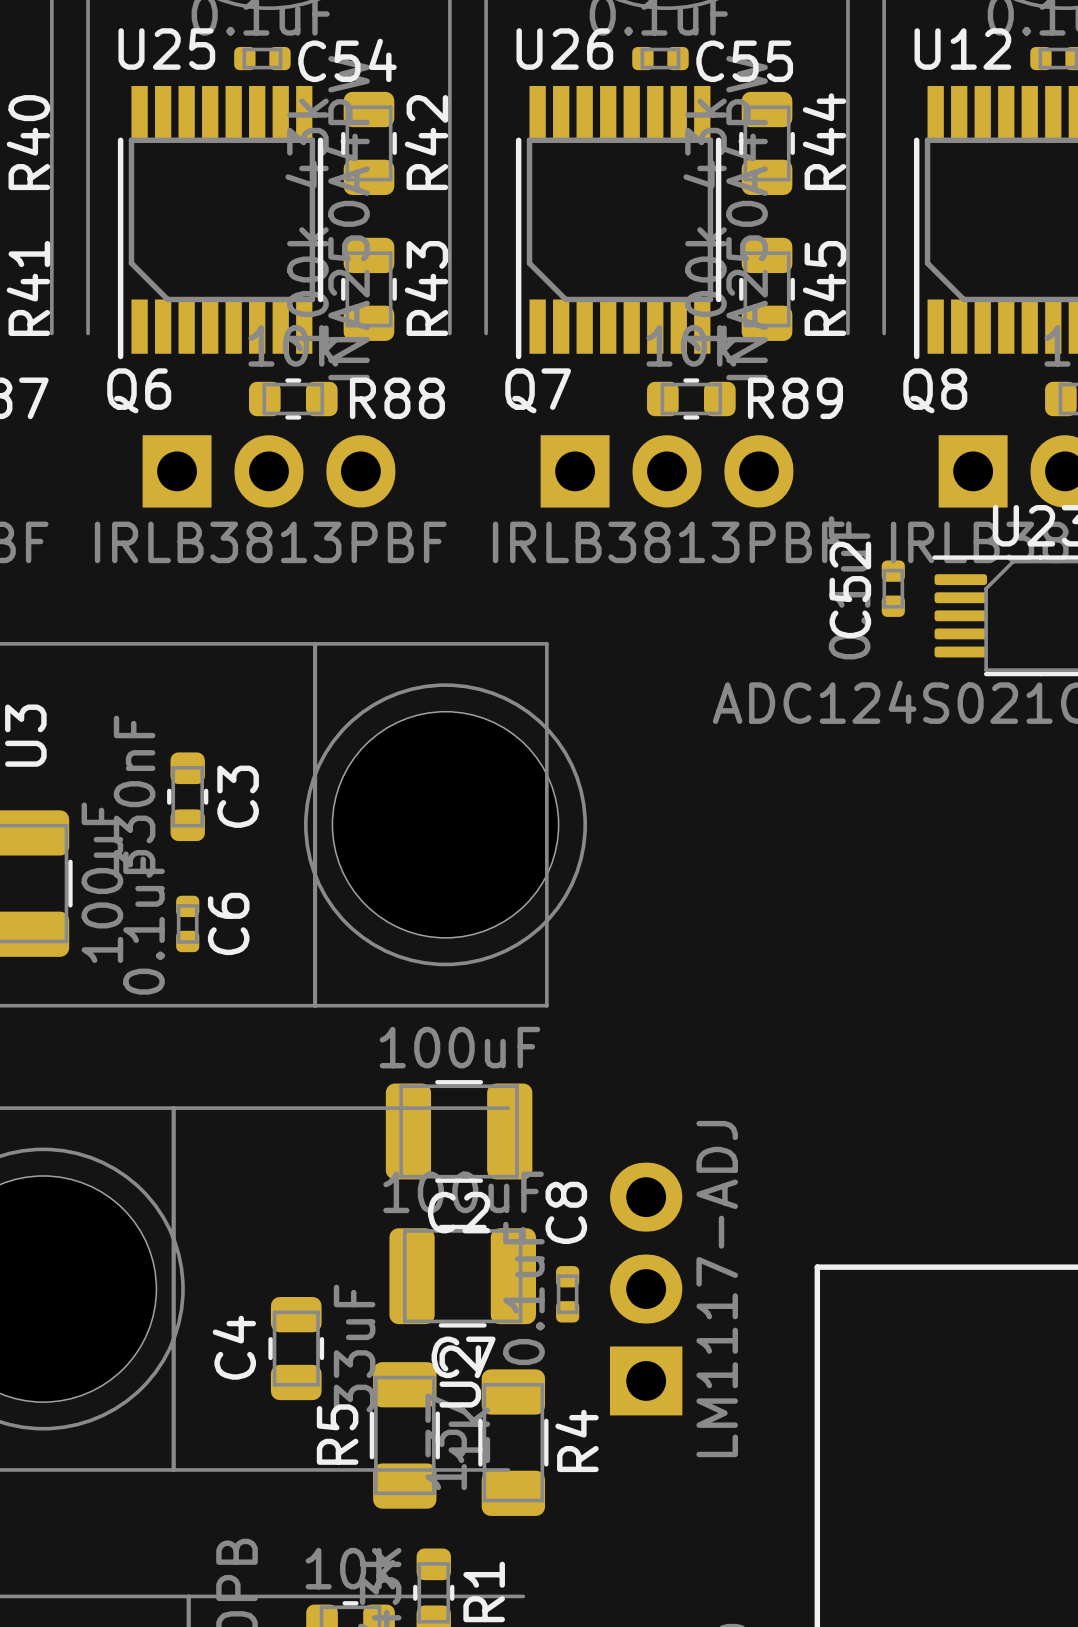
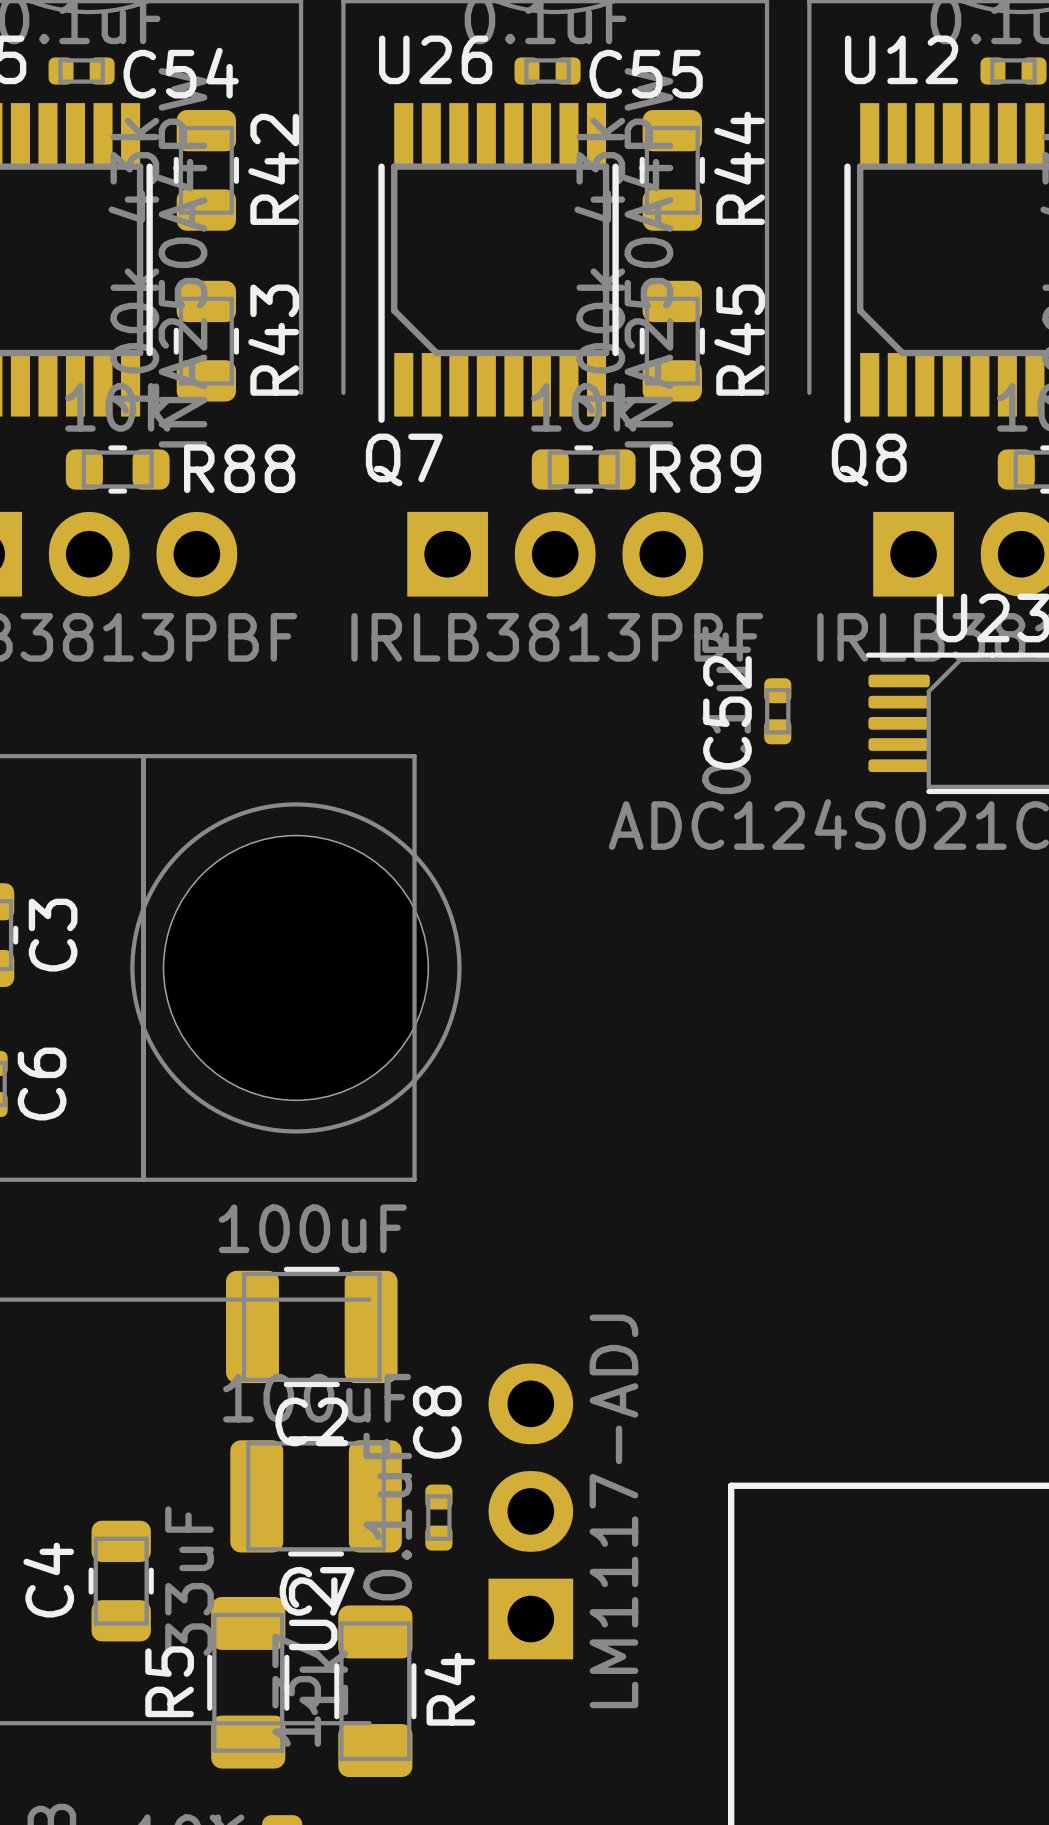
C52 position: (893, 588) -> (777, 711)

